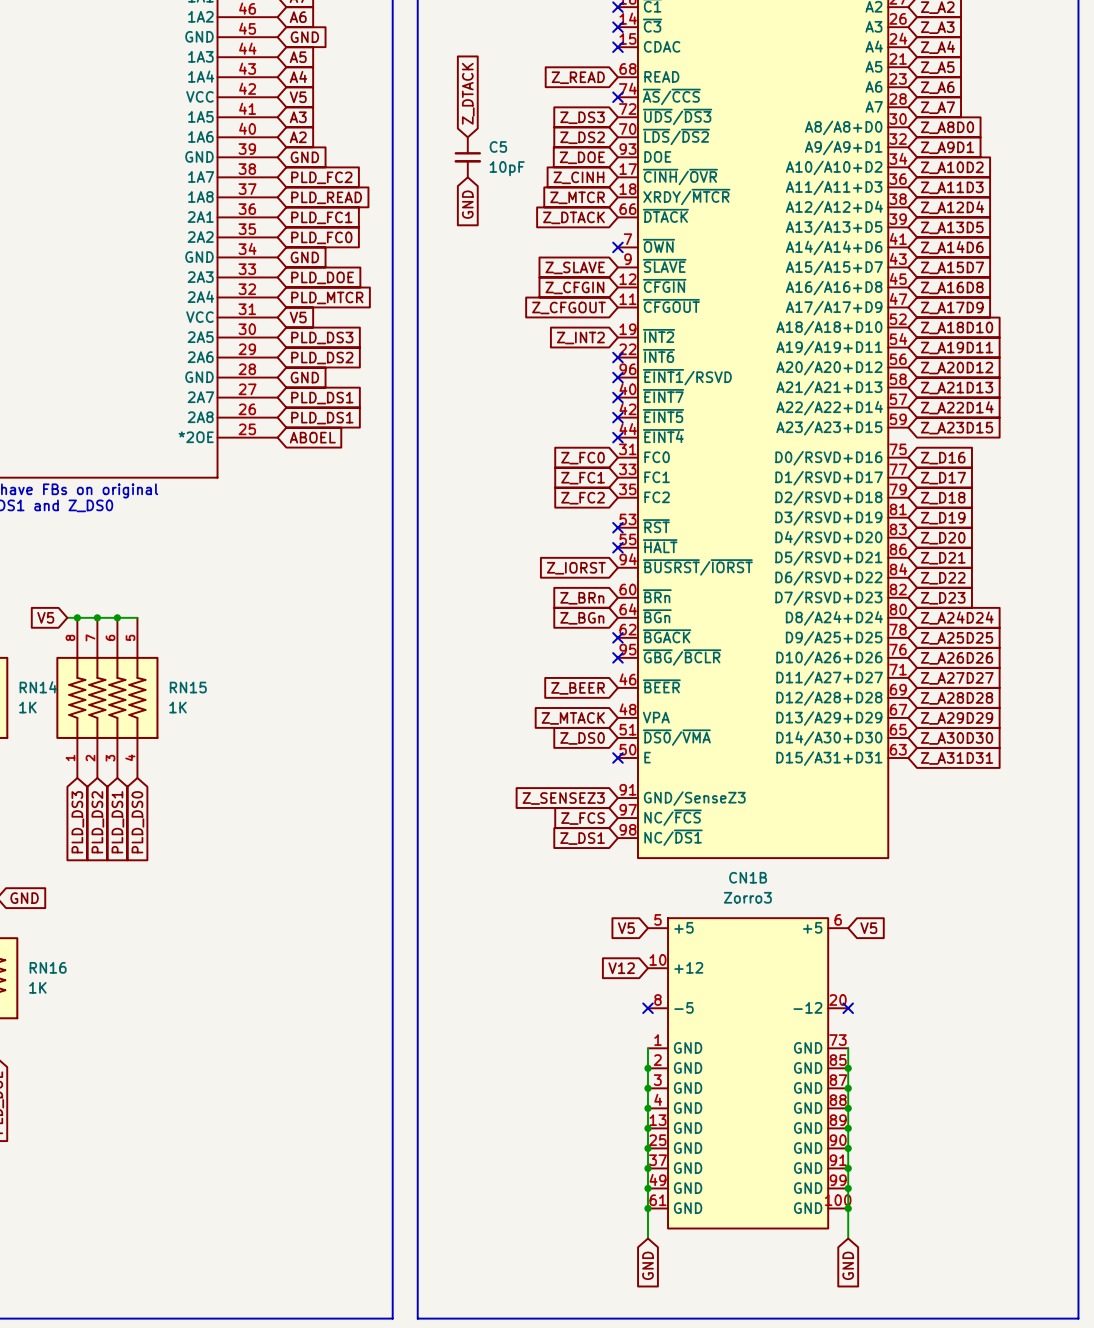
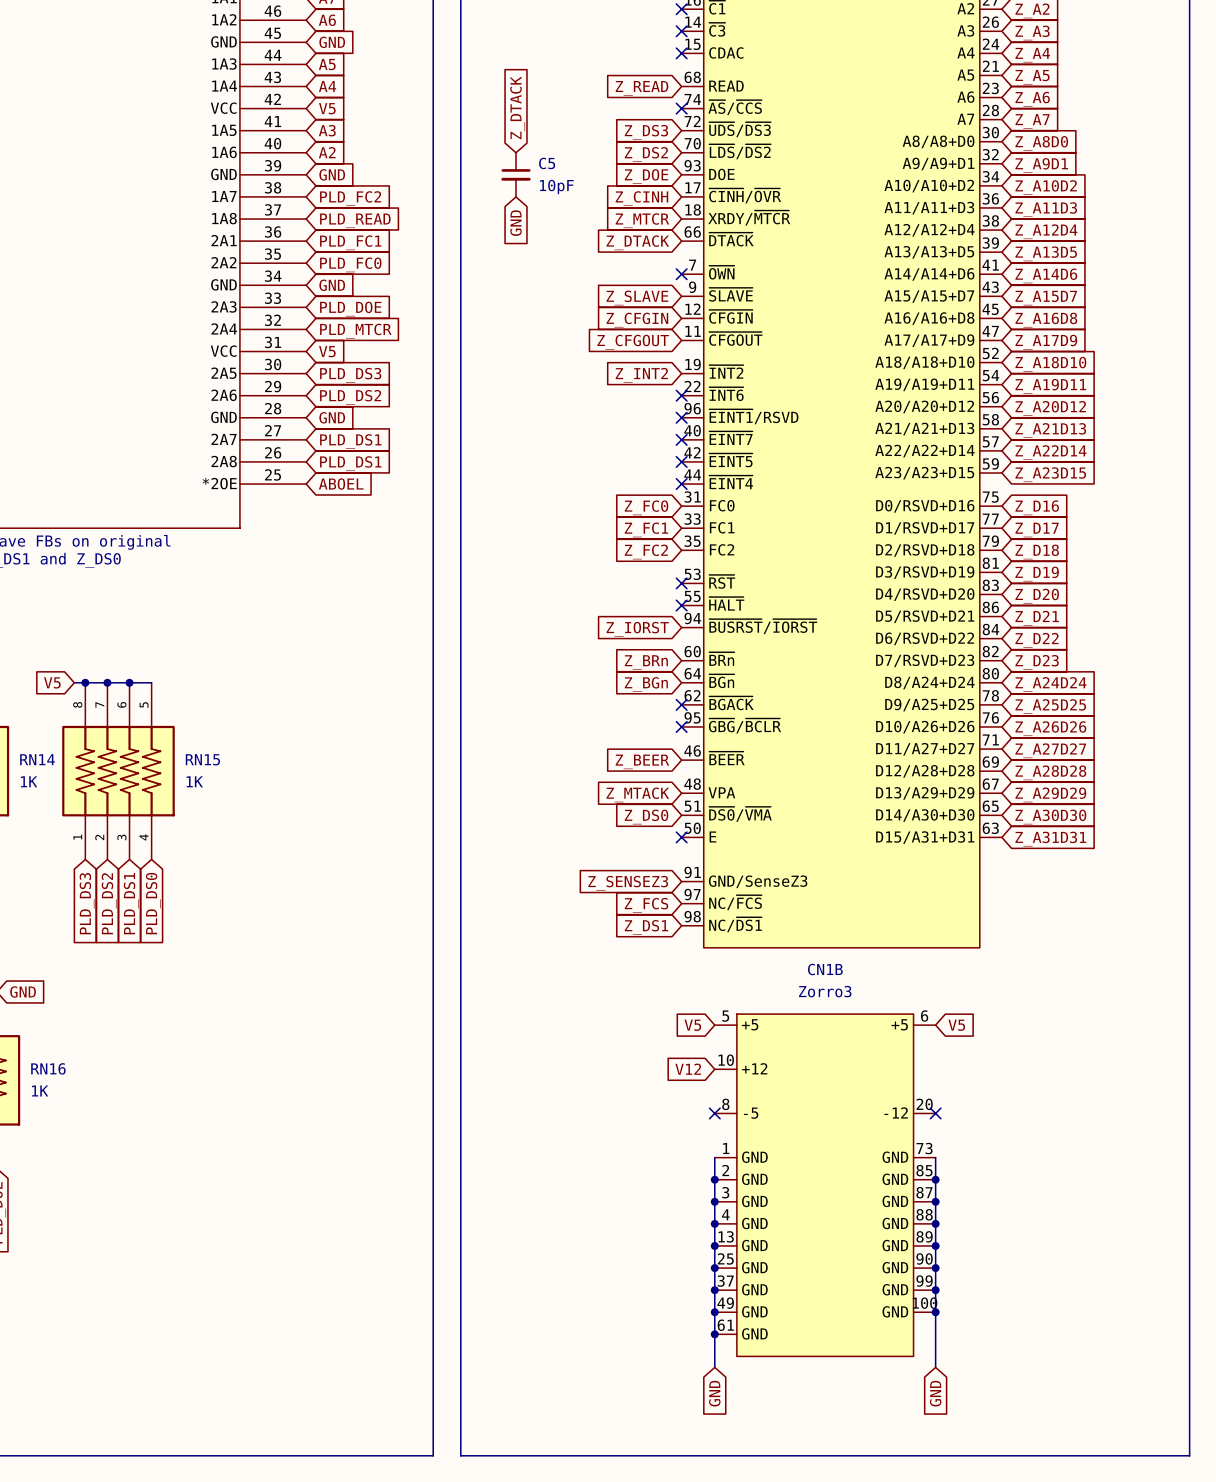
CN1B symbol: [647, 917, 849, 1230] -> [714, 1013, 936, 1358]
junction: (848, 1208) -> none

